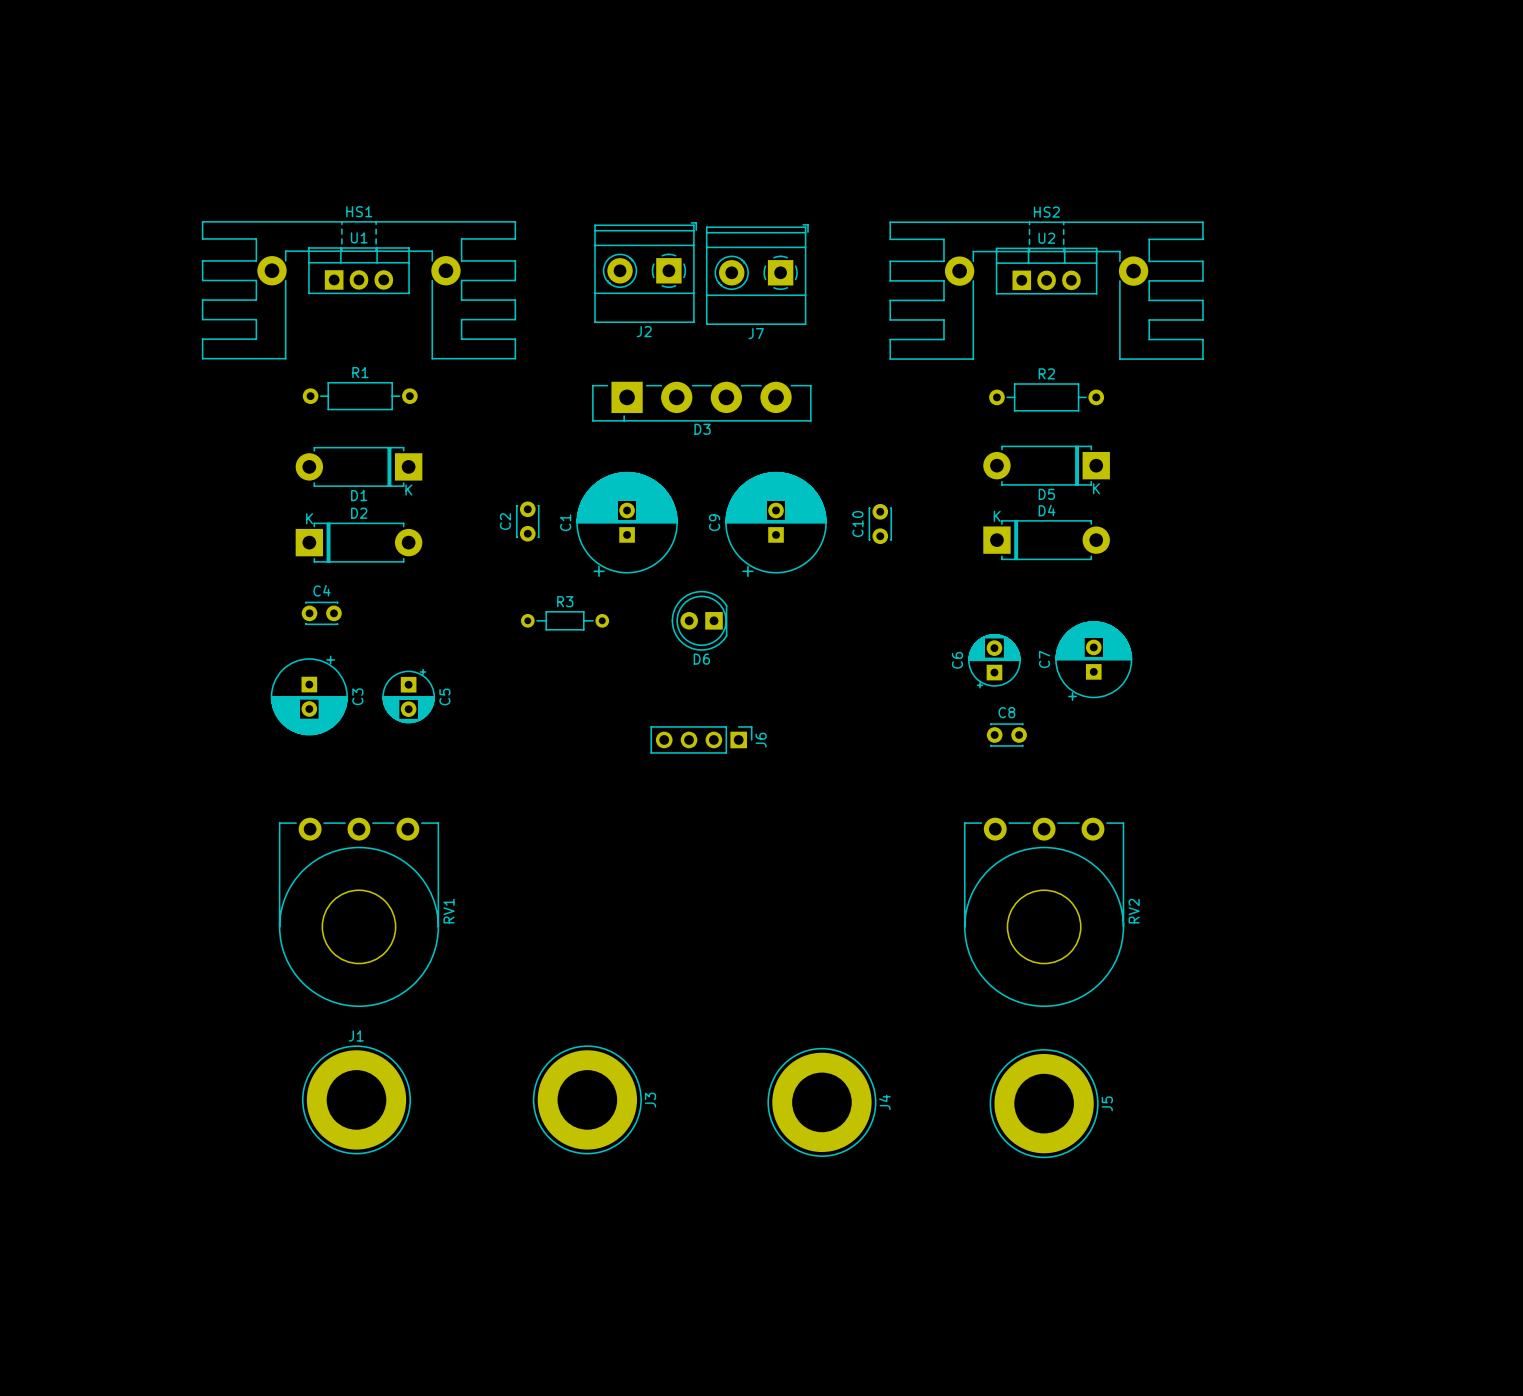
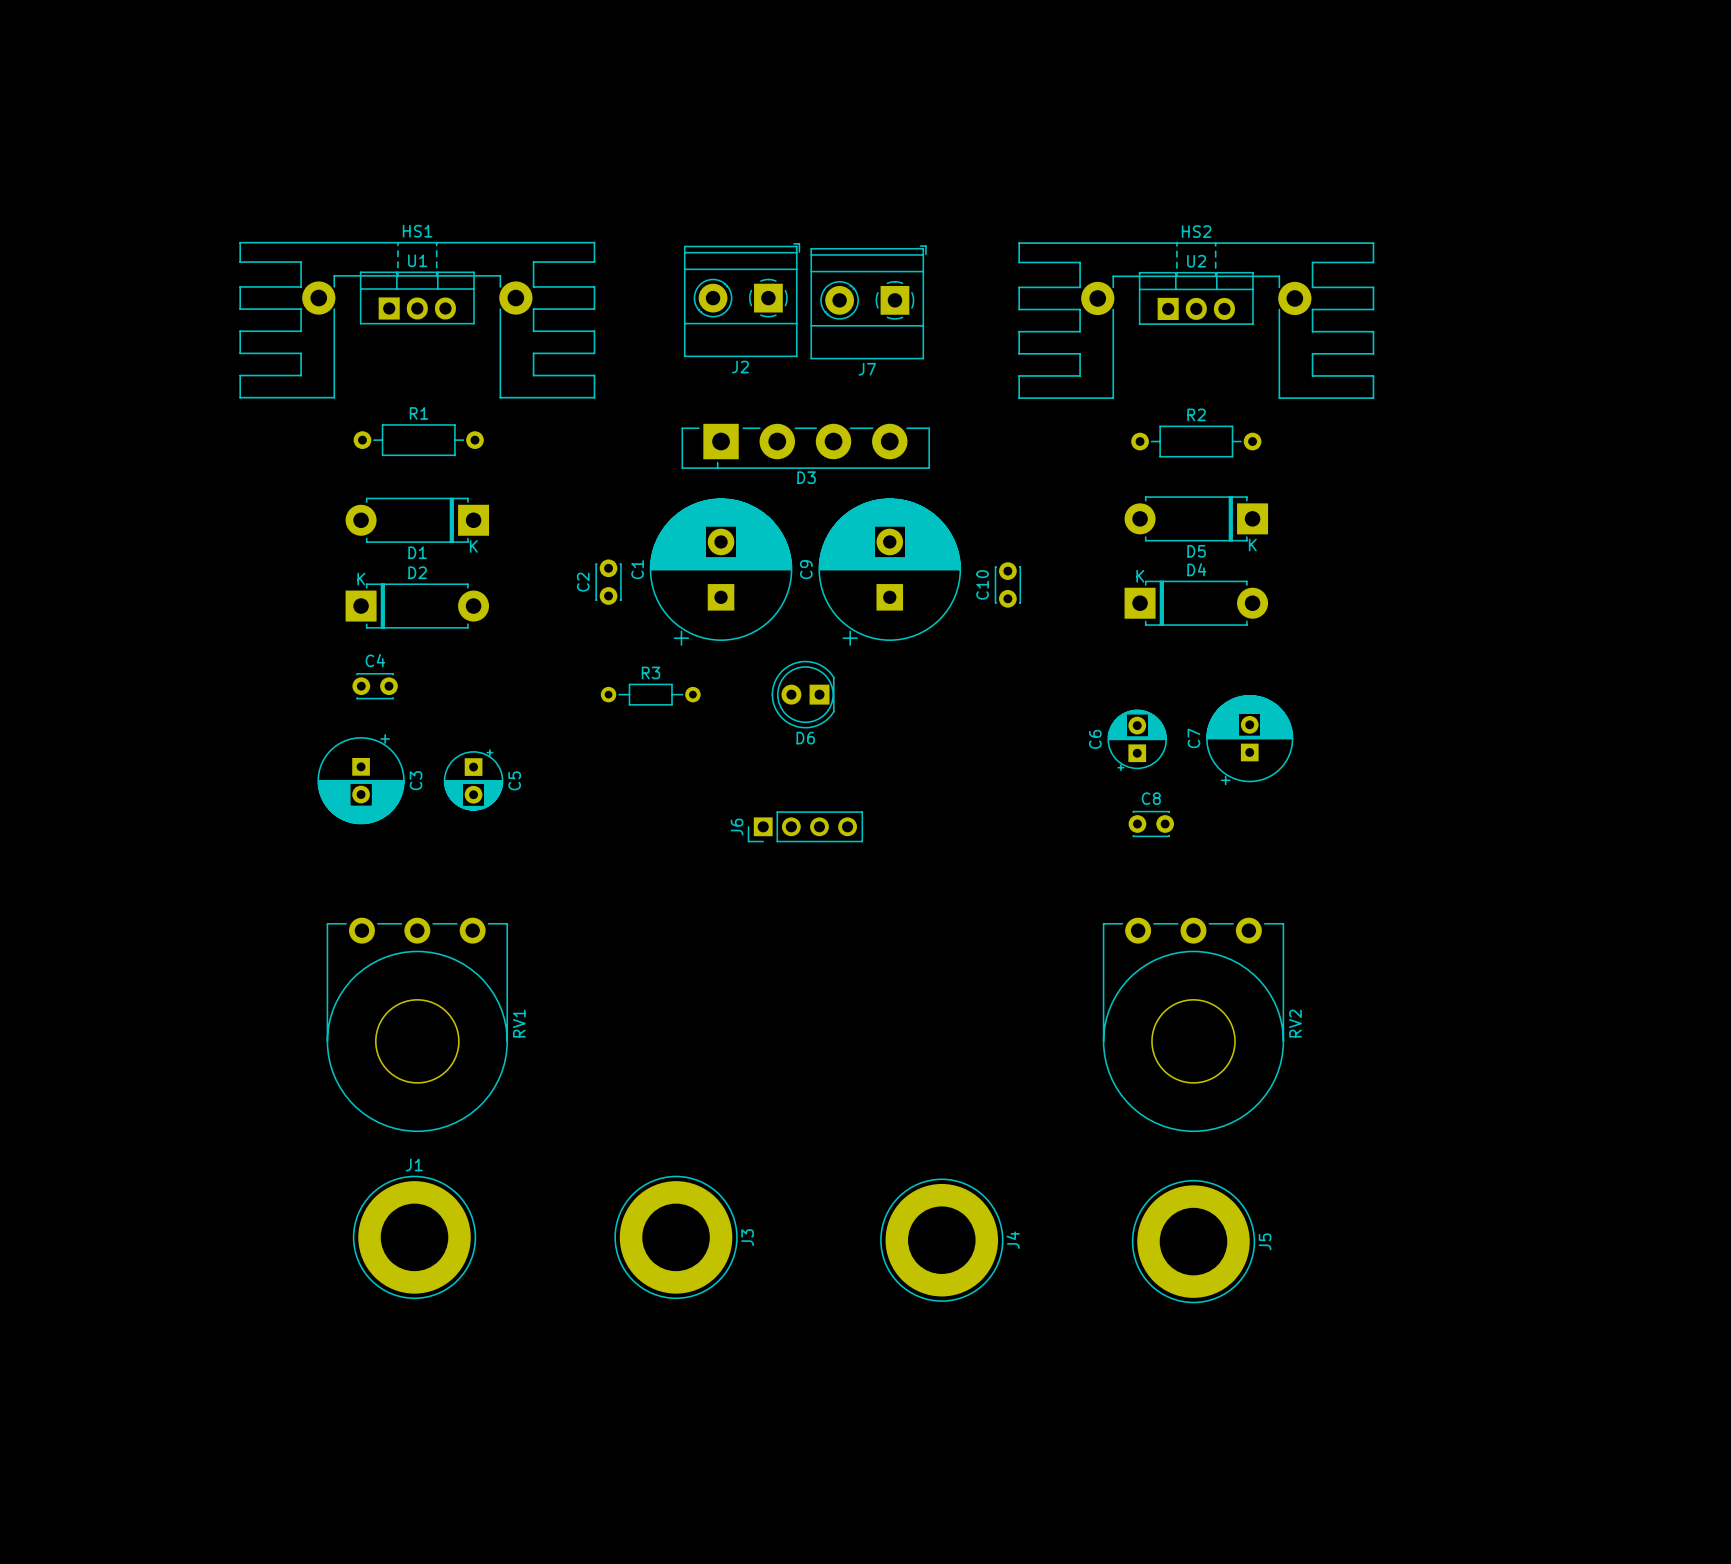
C1 footprint: [576, 472, 678, 577] -> [649, 498, 793, 646]
C9 footprint: [725, 472, 827, 577] -> [818, 498, 961, 646]
J6 rotation: 0° (701, 739) -> 180° (805, 826)

